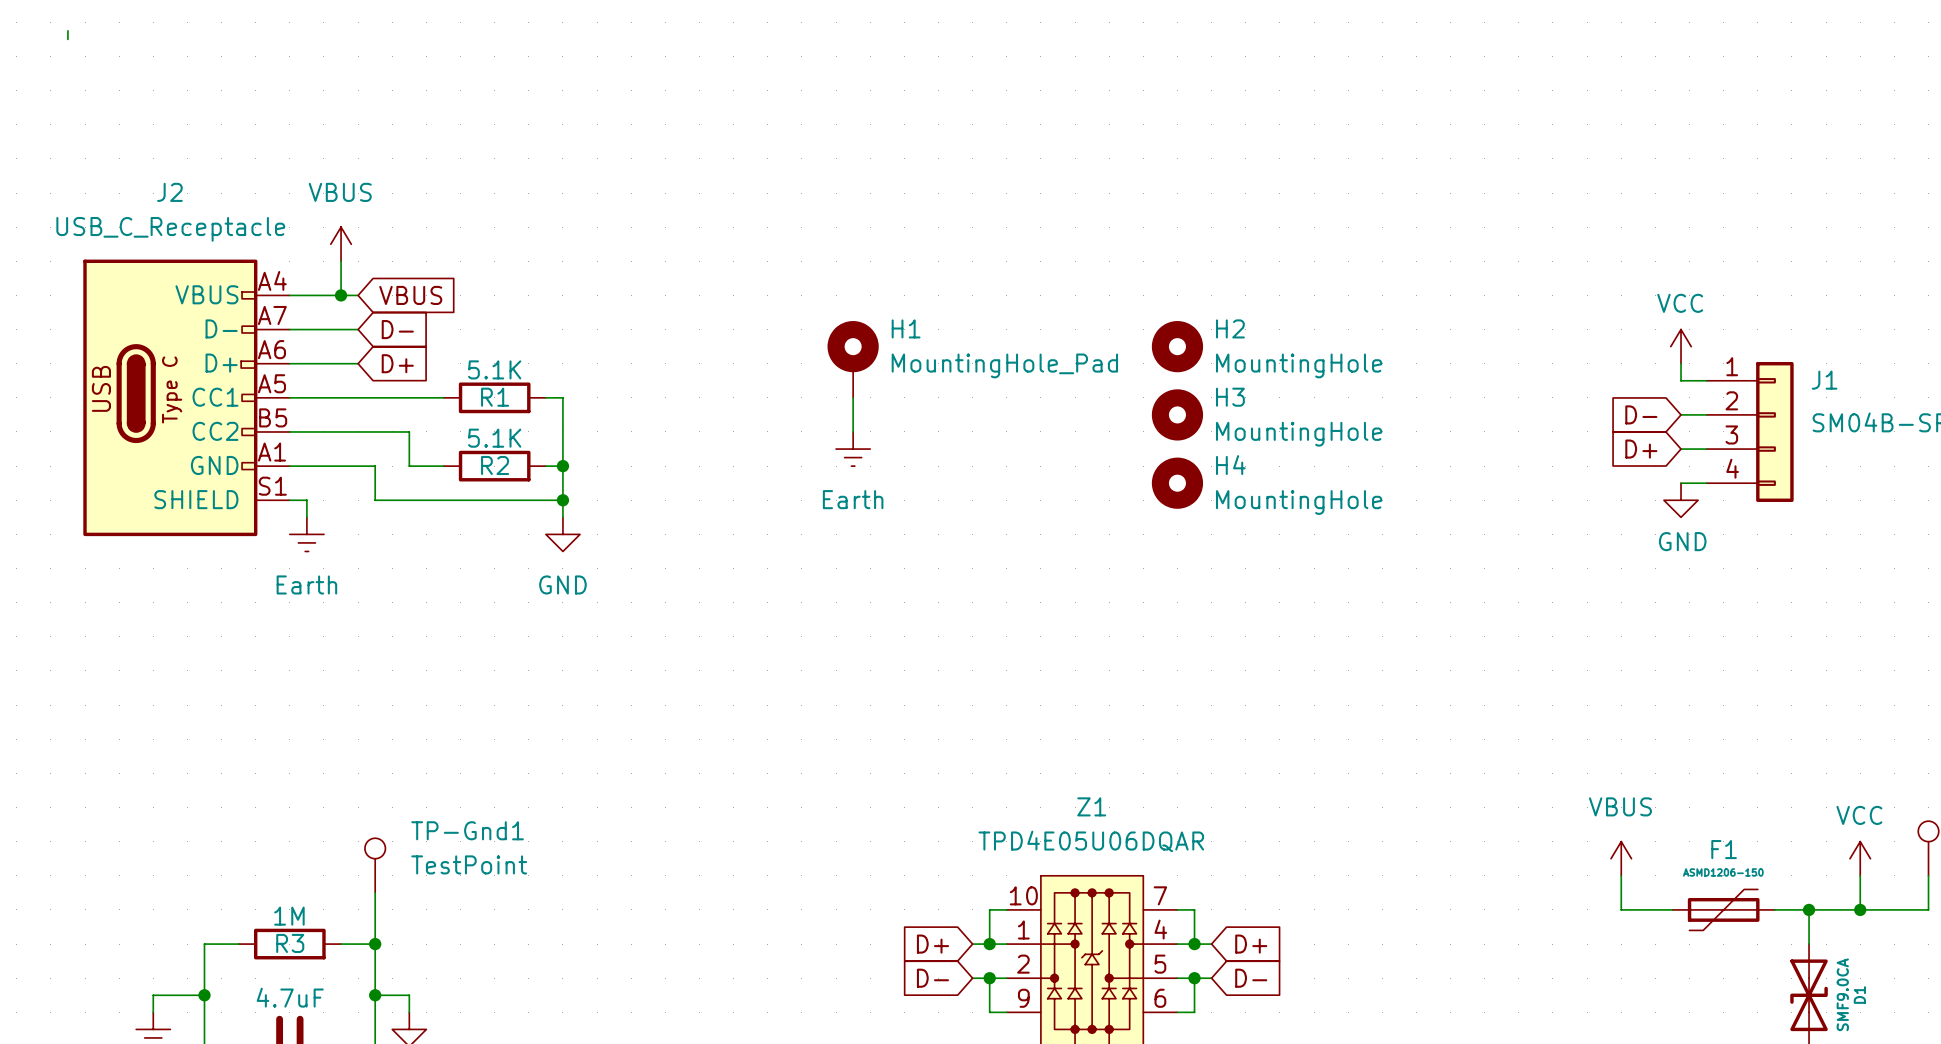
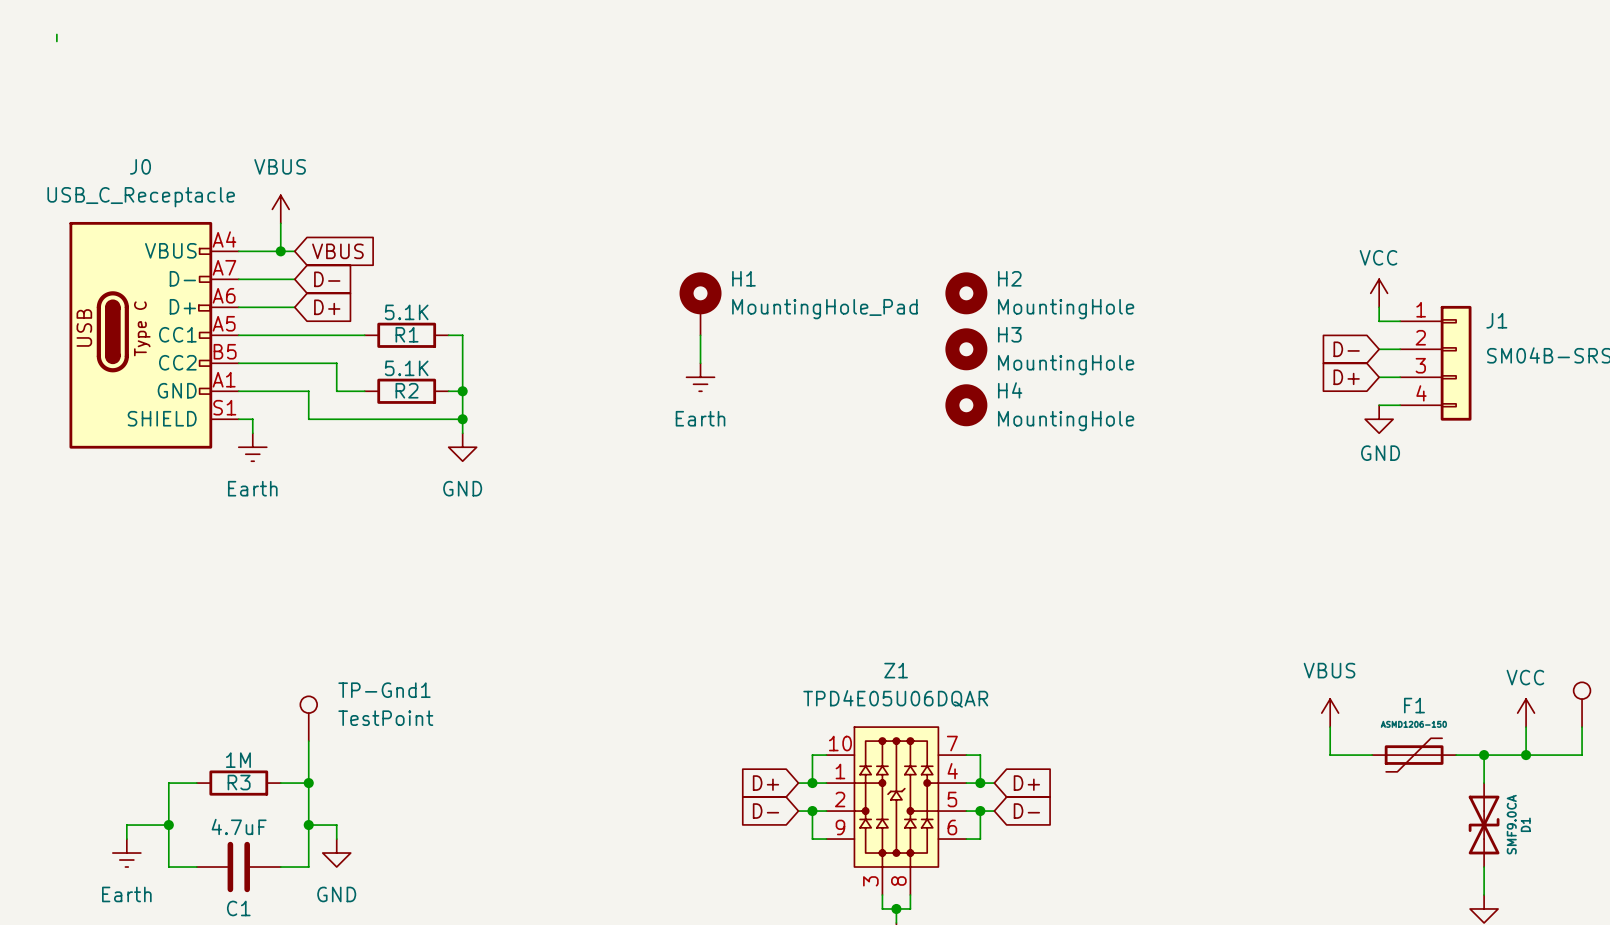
J2 name: J2 (169, 192) -> J0 (140, 166)

